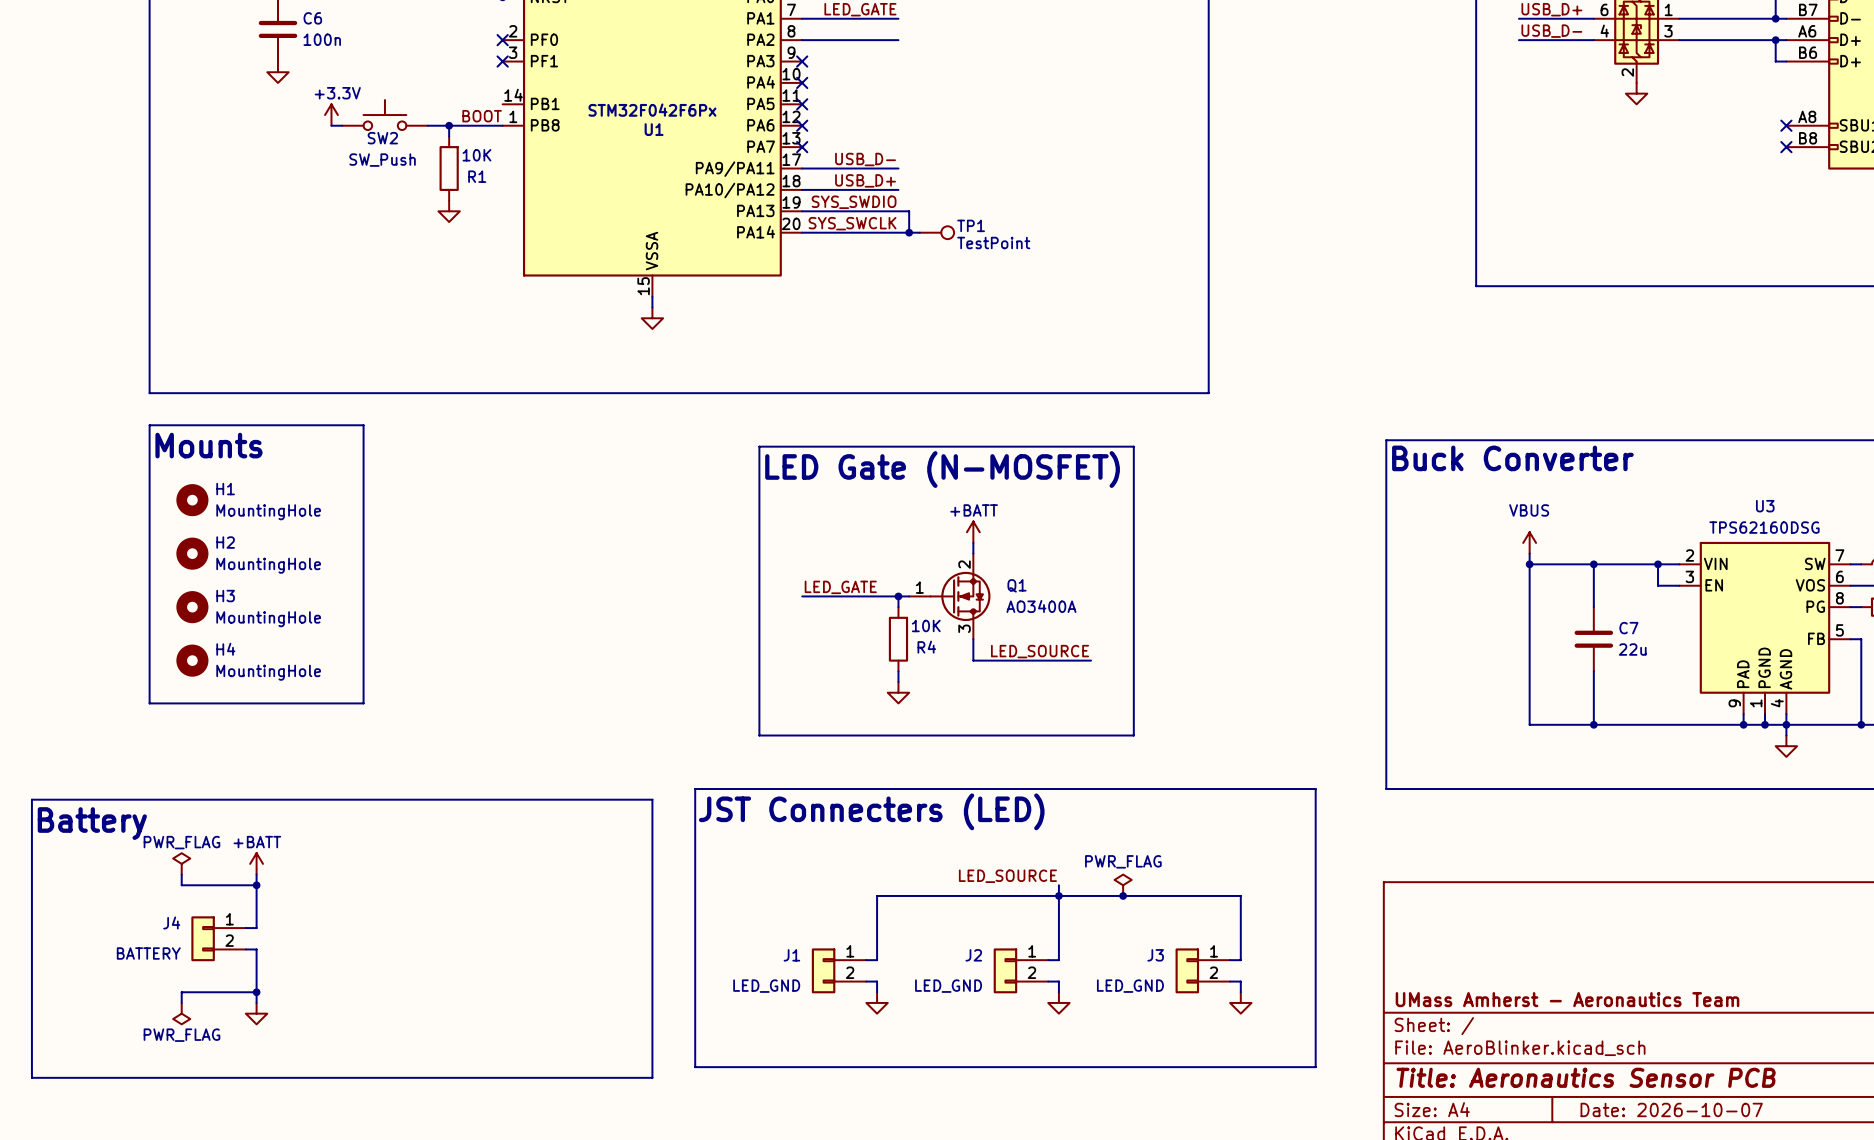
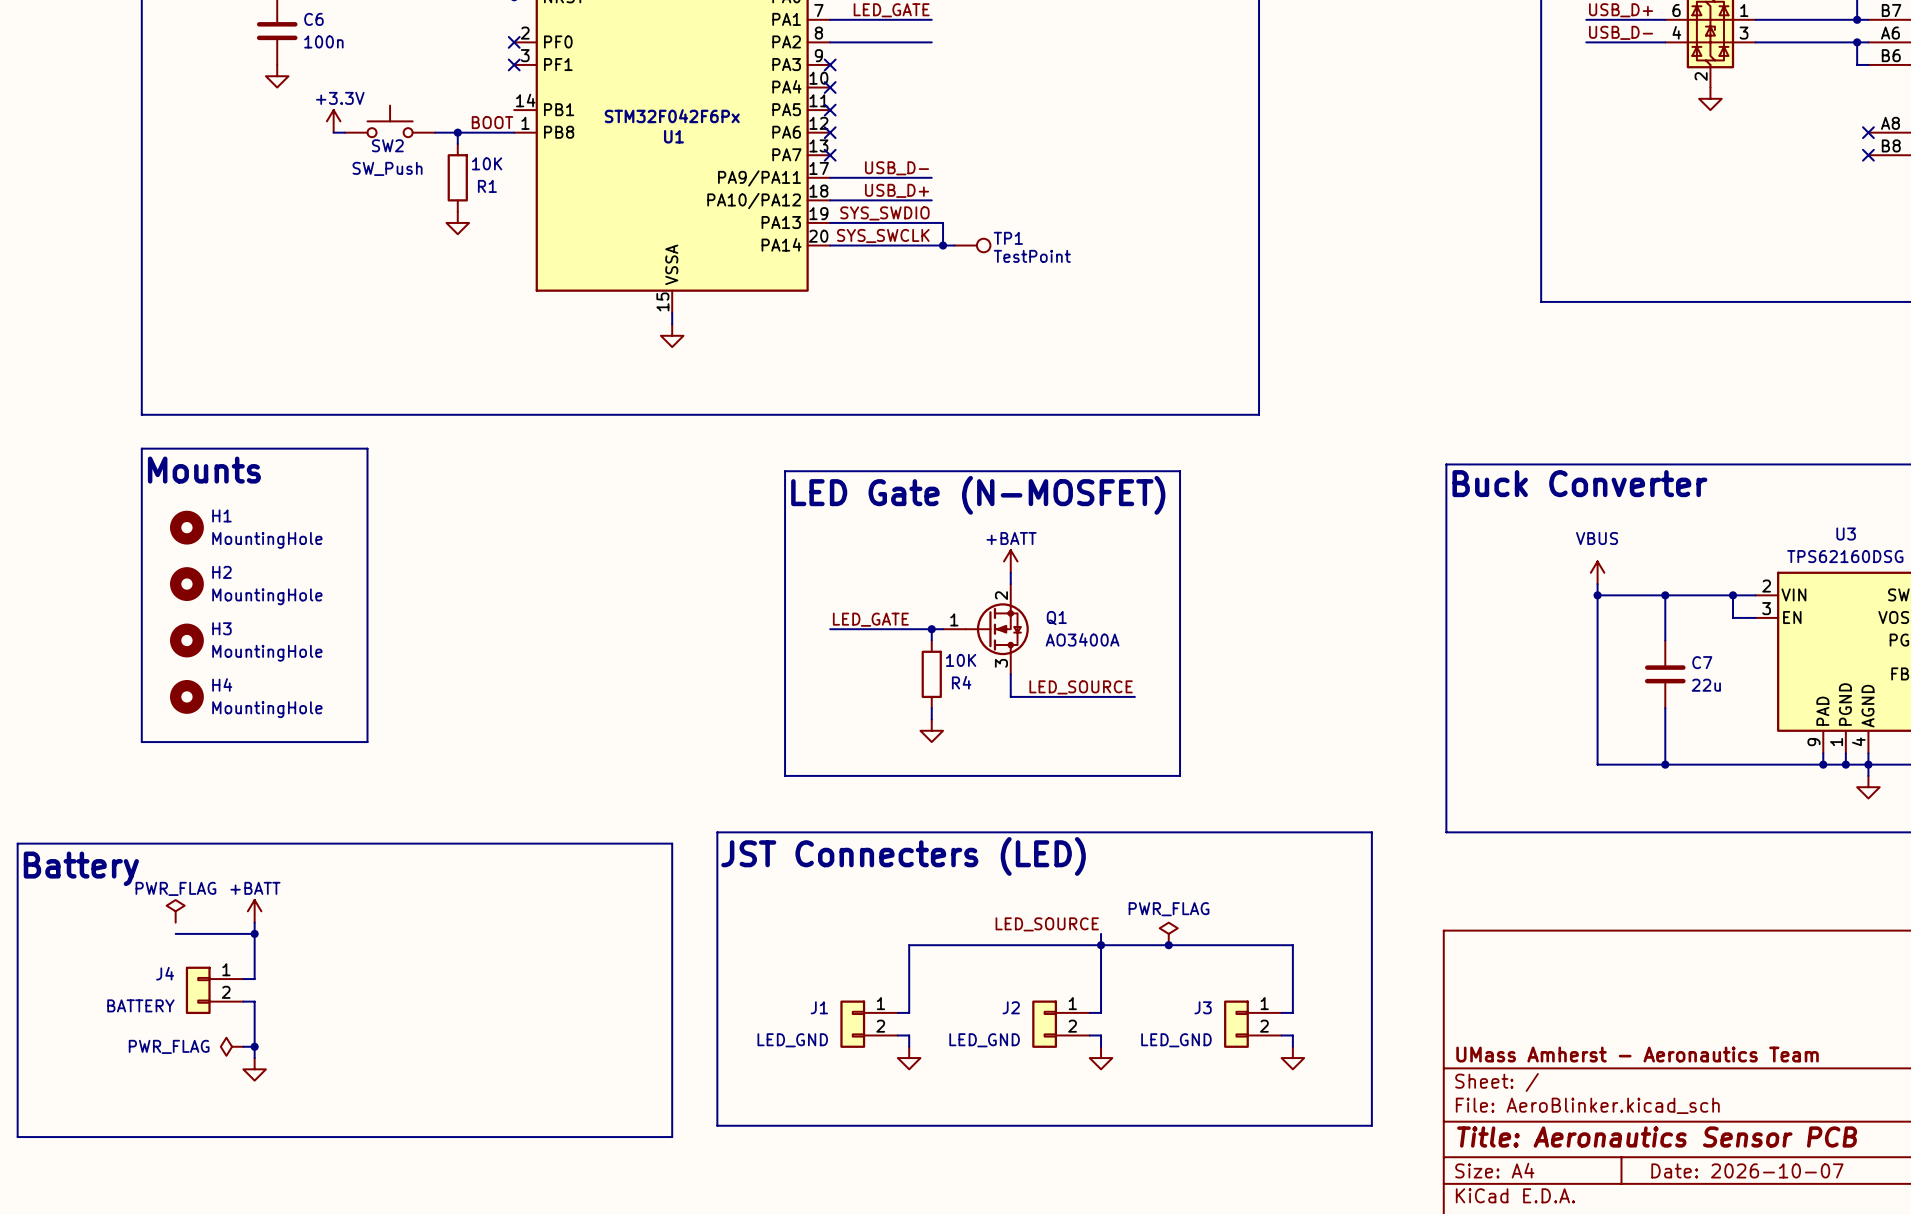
wire: (181, 874) (181, 885) -> none
wire: (245, 992) (181, 992) (181, 1002) -> none
power symbol rotation: 0° (181, 1013) -> 90° clockwise (232, 1046)
power symbol position: PWR_FLAG (181, 1013) -> PWR_FLAG (232, 1046)
power symbol text position: PWR_FLAG (181, 1035) -> PWR_FLAG (169, 1046)

